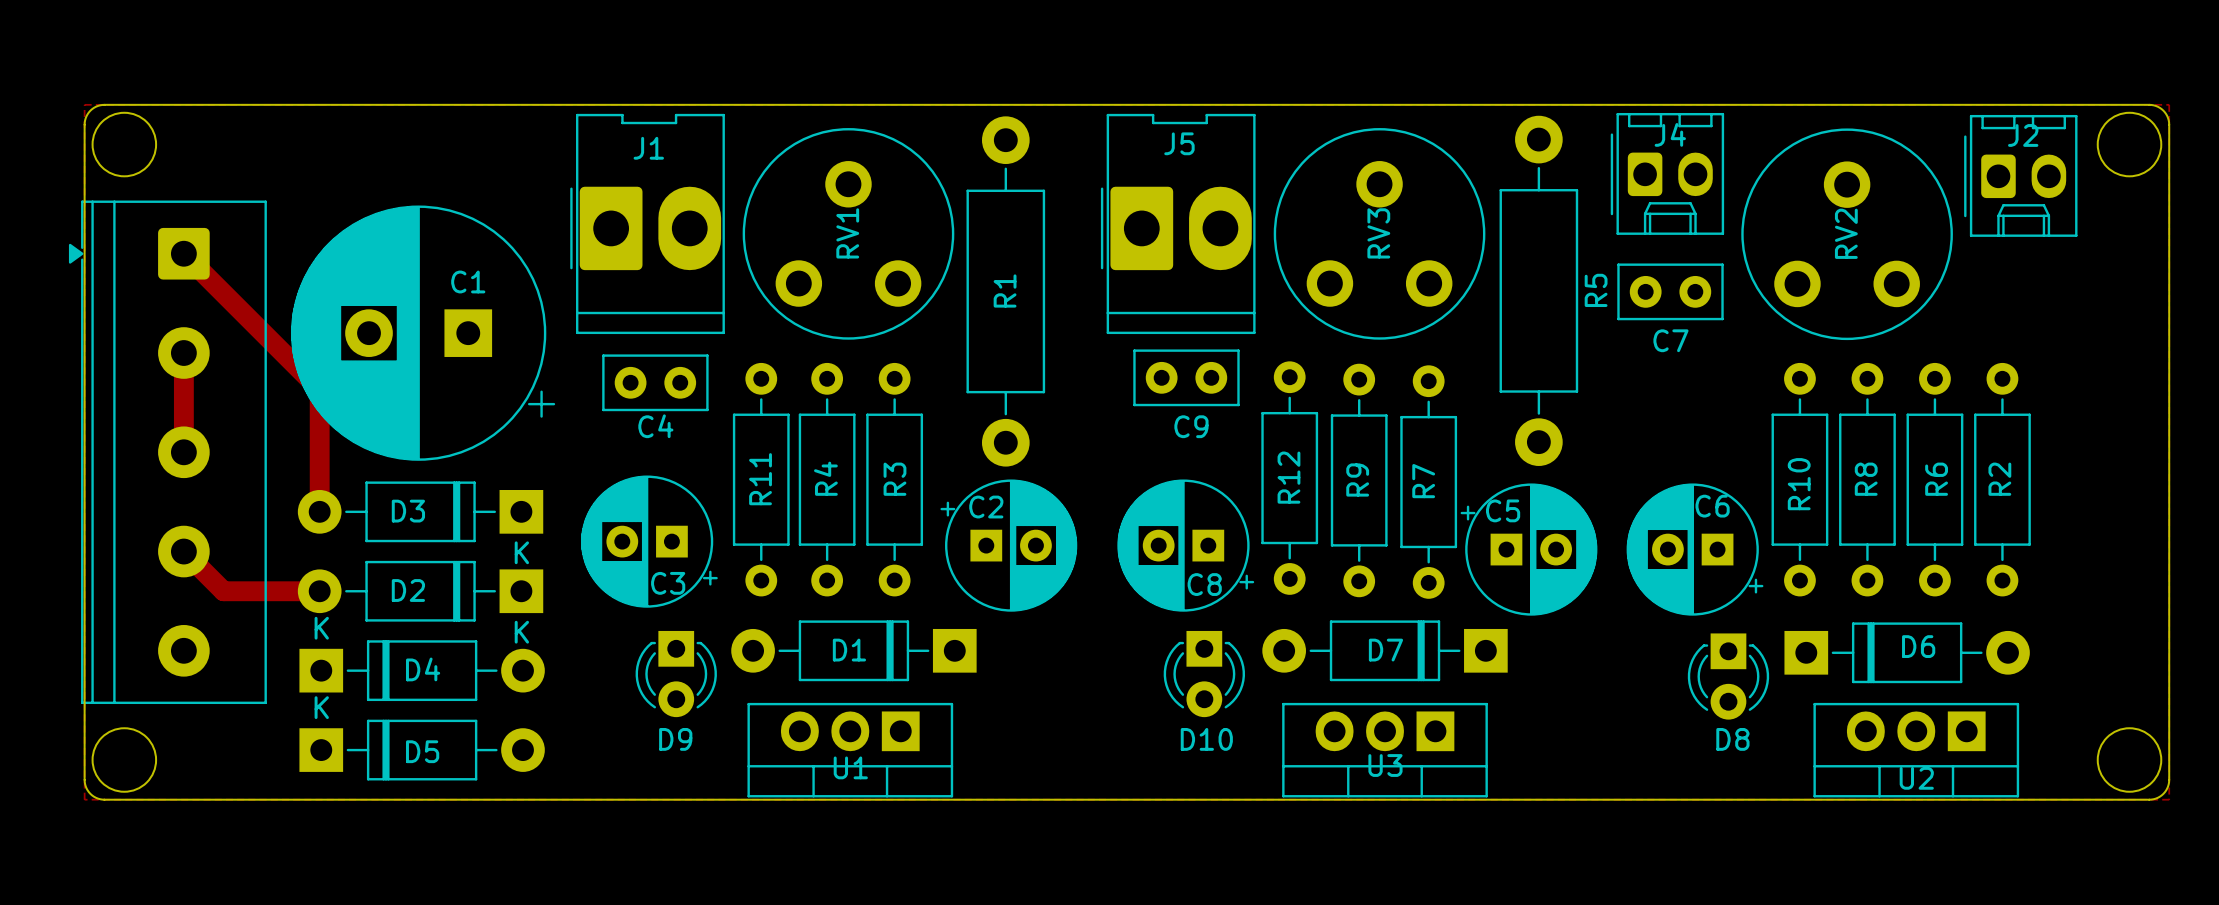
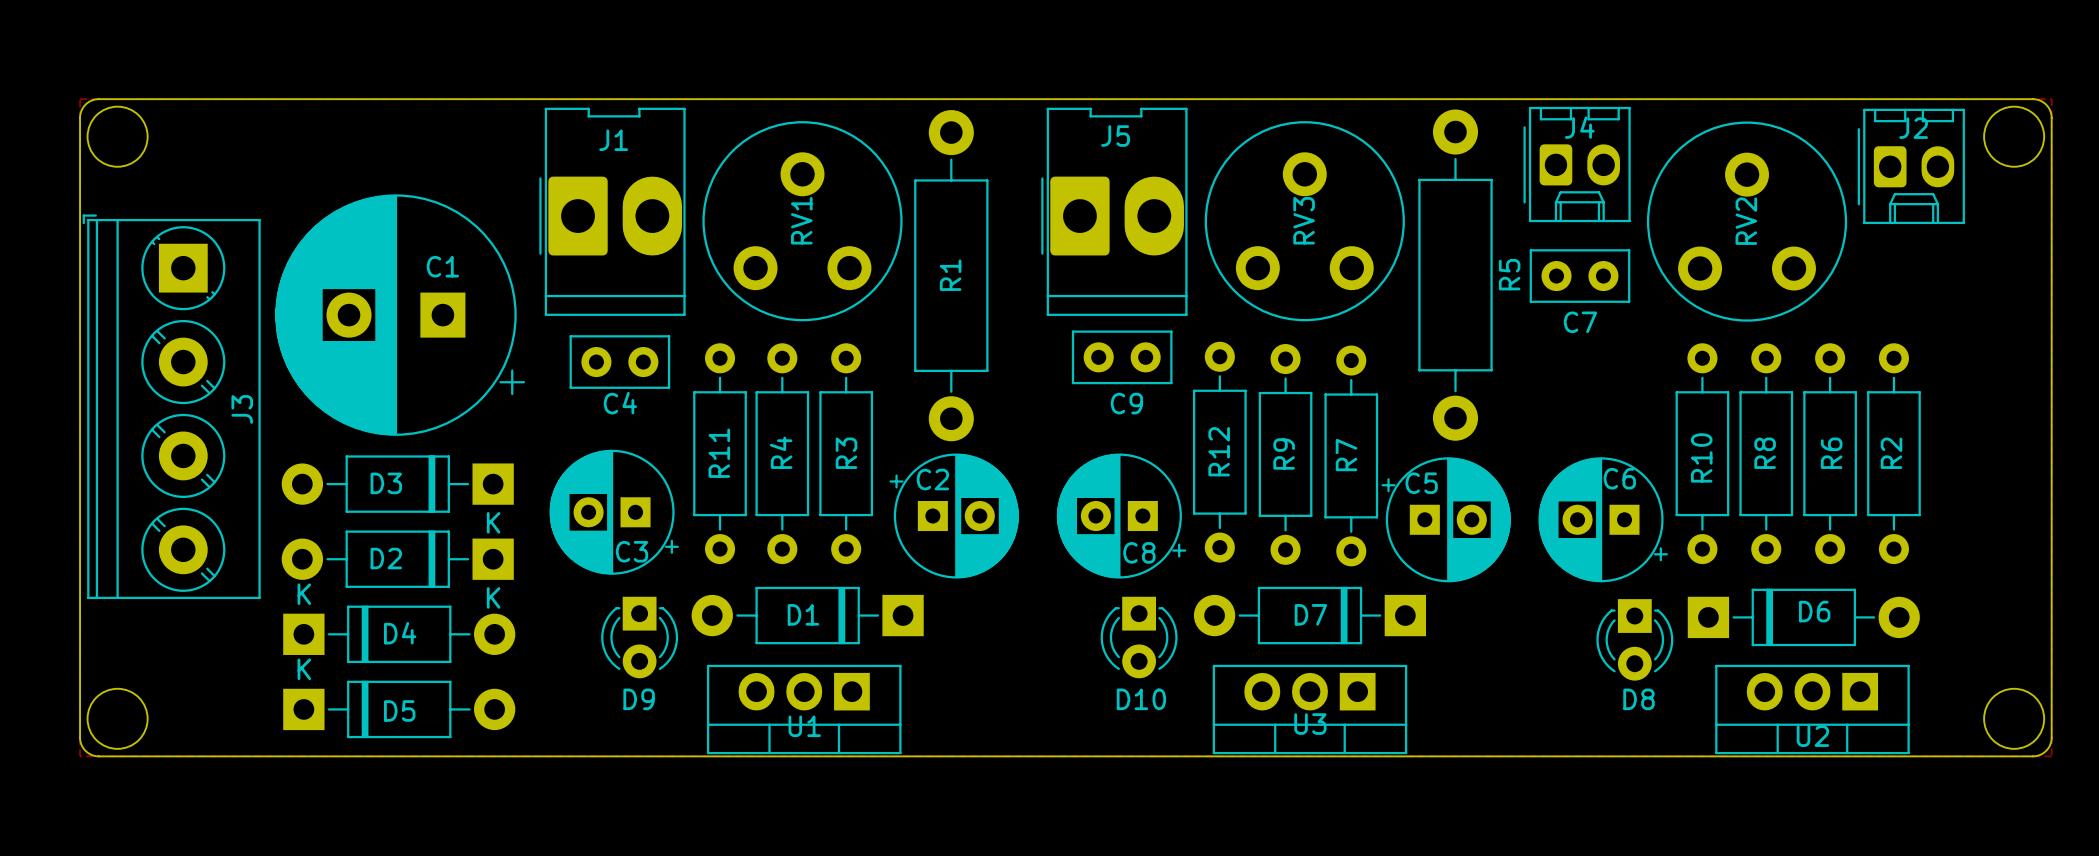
track: (183, 253) (319, 389) (319, 511) -> none
track: (183, 353) (183, 452) -> none
J3: none -> (171, 406)
part: (167, 452) -> none
track: (183, 551) (223, 591) (319, 591) -> none

